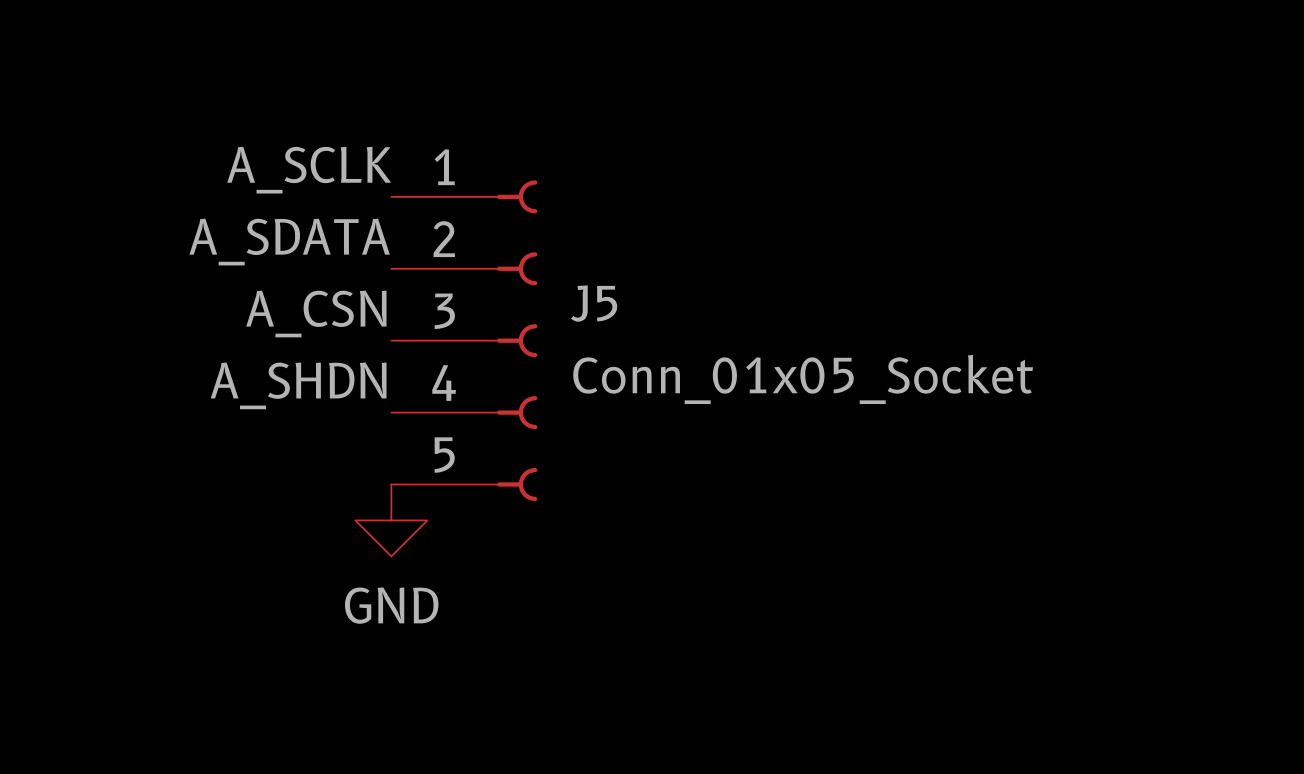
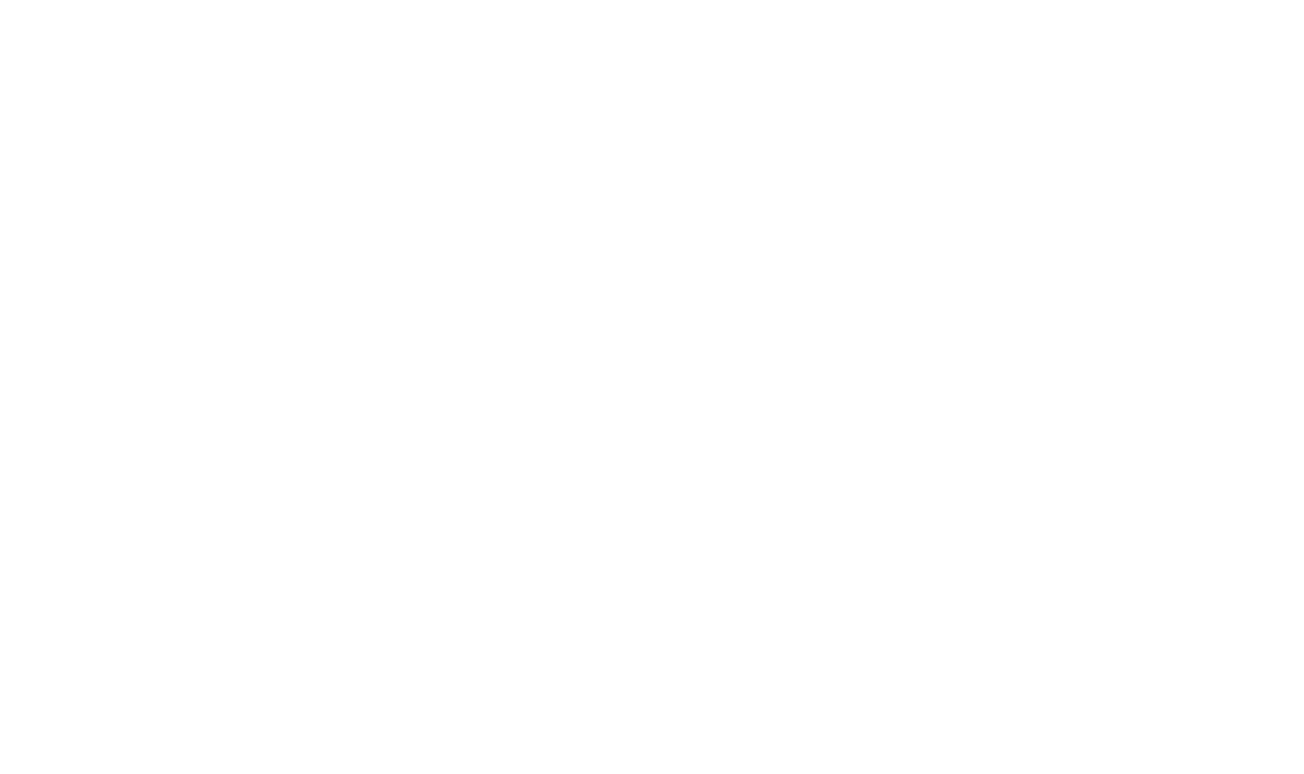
label: A_SCLK (309, 170) -> none
label: A_SDATA (289, 242) -> none
label: A_CSN (316, 313) -> none
J5: Conn_01x05_Socket (464, 340) -> none
label: A_SHDN (298, 385) -> none
power symbol: GND (391, 520) -> none

